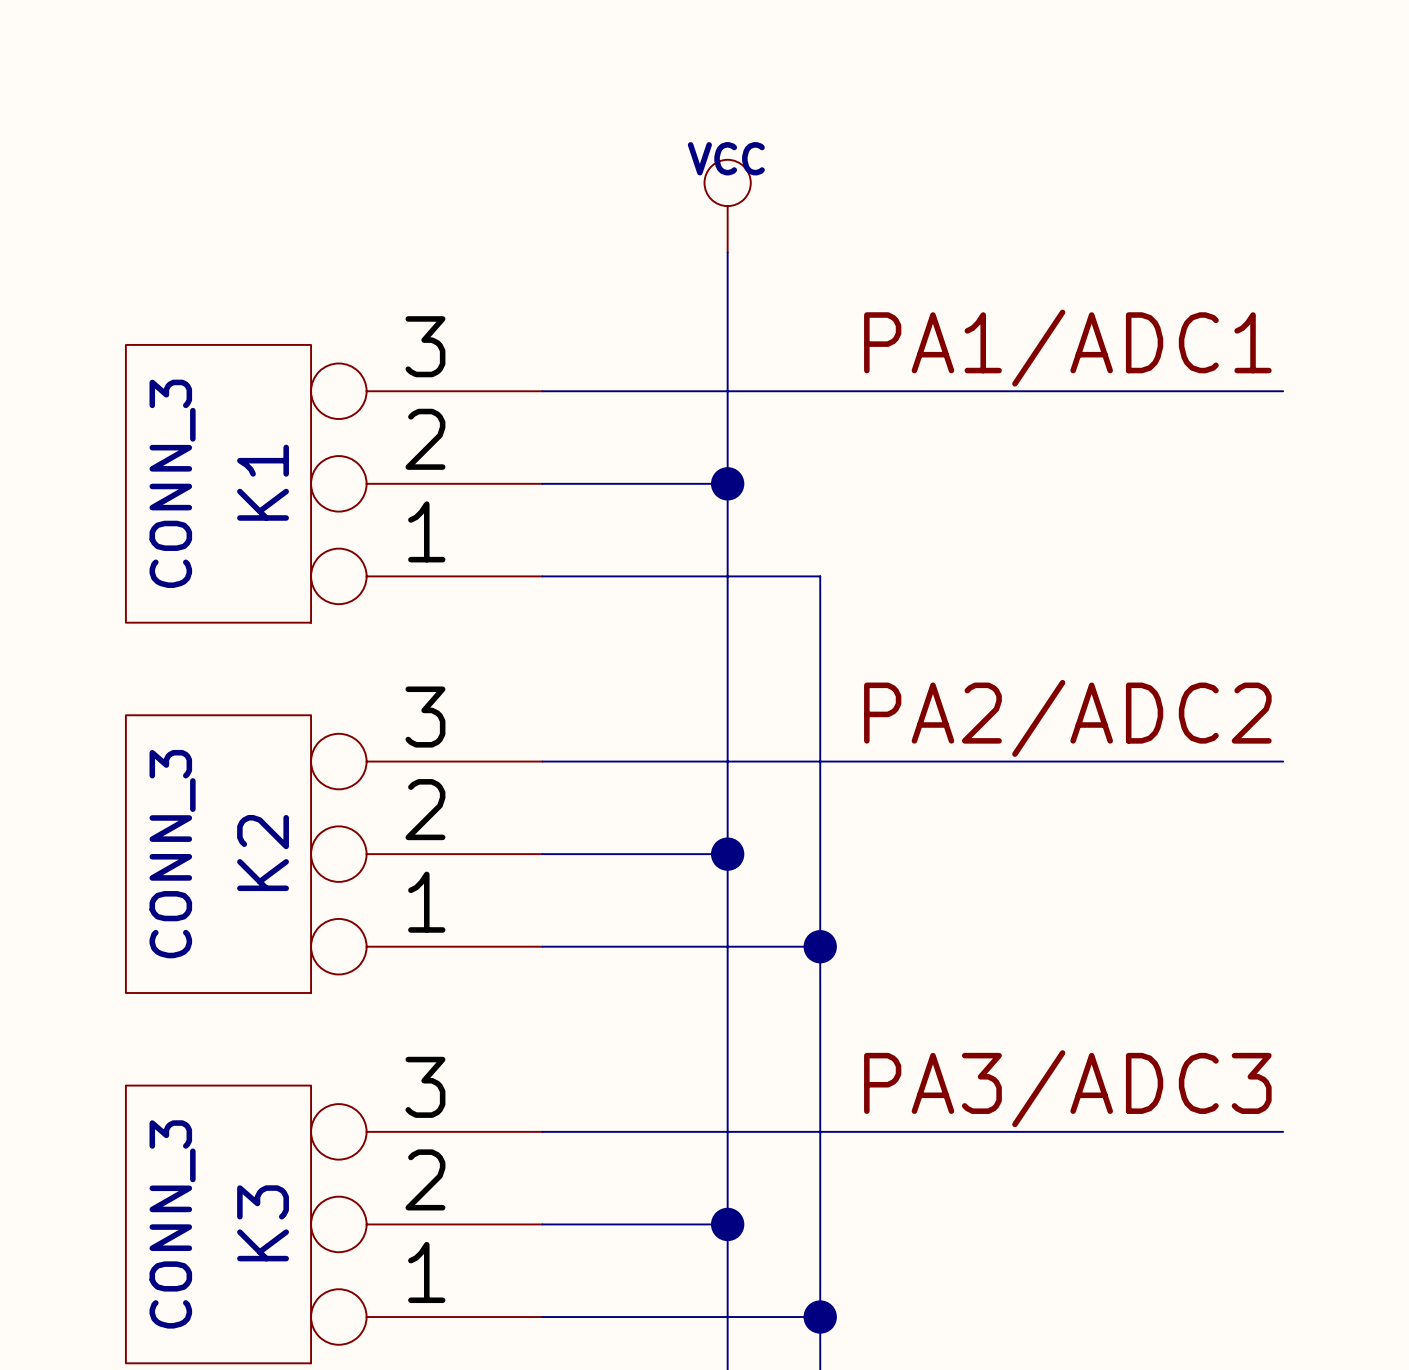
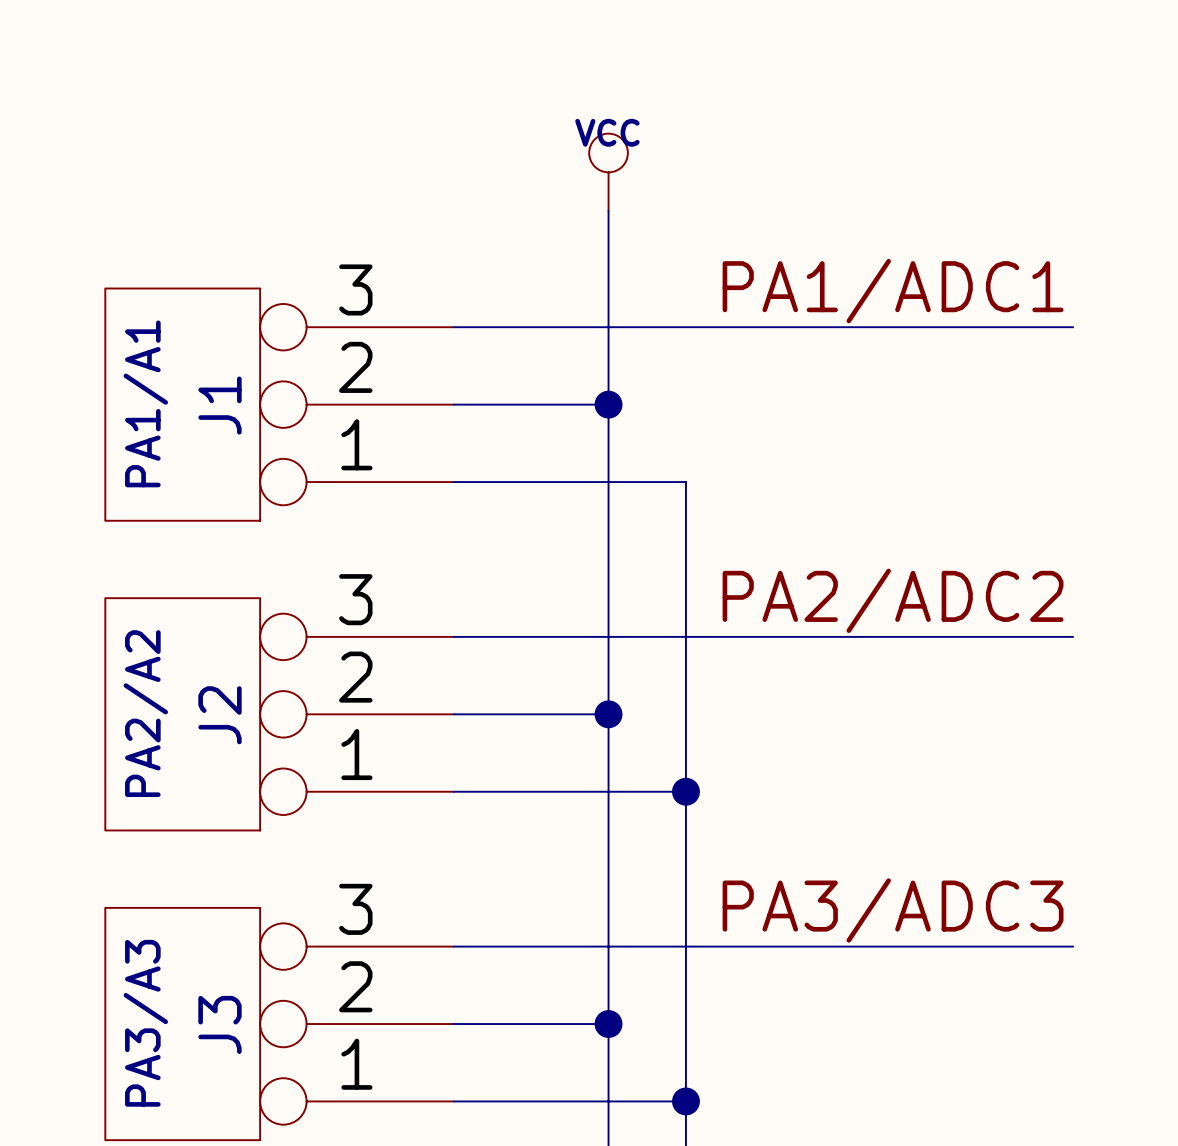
K1 name: K1 (263, 482) -> J1 (219, 405)
K1 value: CONN_3 (172, 483) -> PA1/A1 (145, 403)
K2 name: K2 (263, 853) -> J2 (219, 715)
K2 value: CONN_3 (172, 854) -> PA2/A2 (145, 713)
K3 name: K3 (263, 1223) -> J3 (219, 1024)
K3 value: CONN_3 (172, 1224) -> PA3/A3 (145, 1023)

